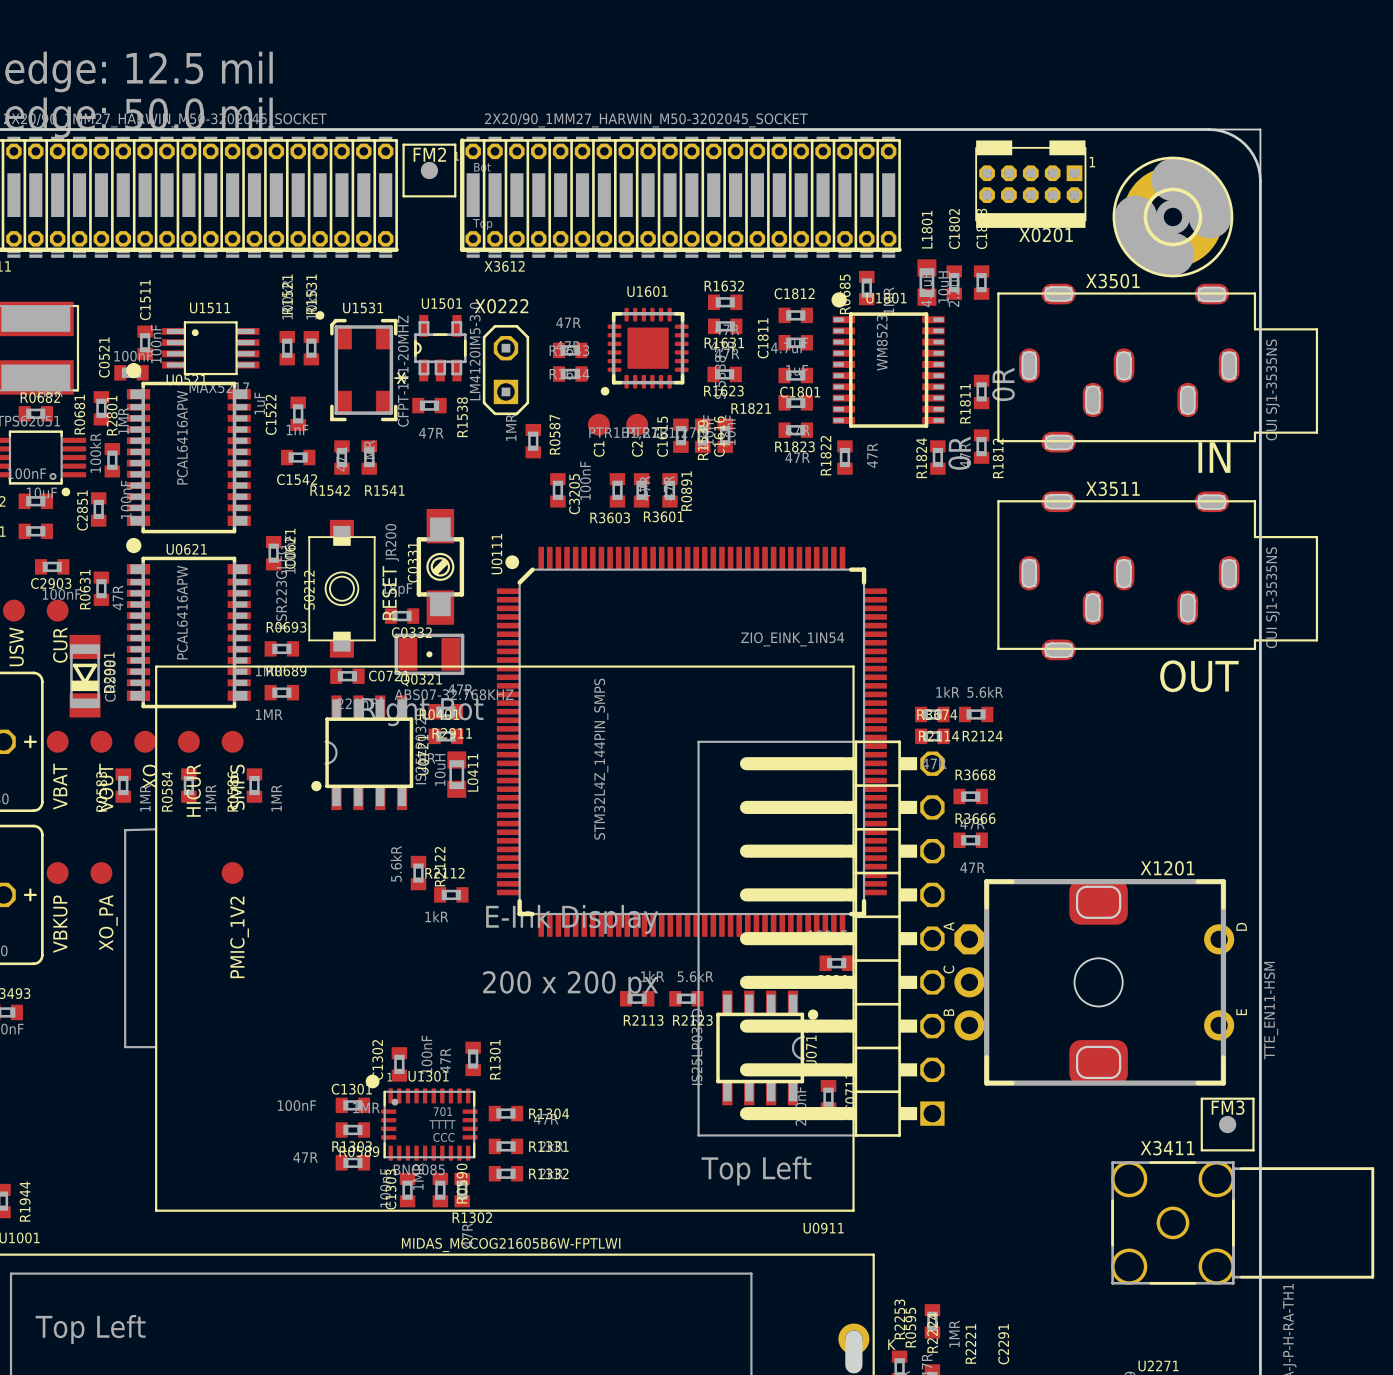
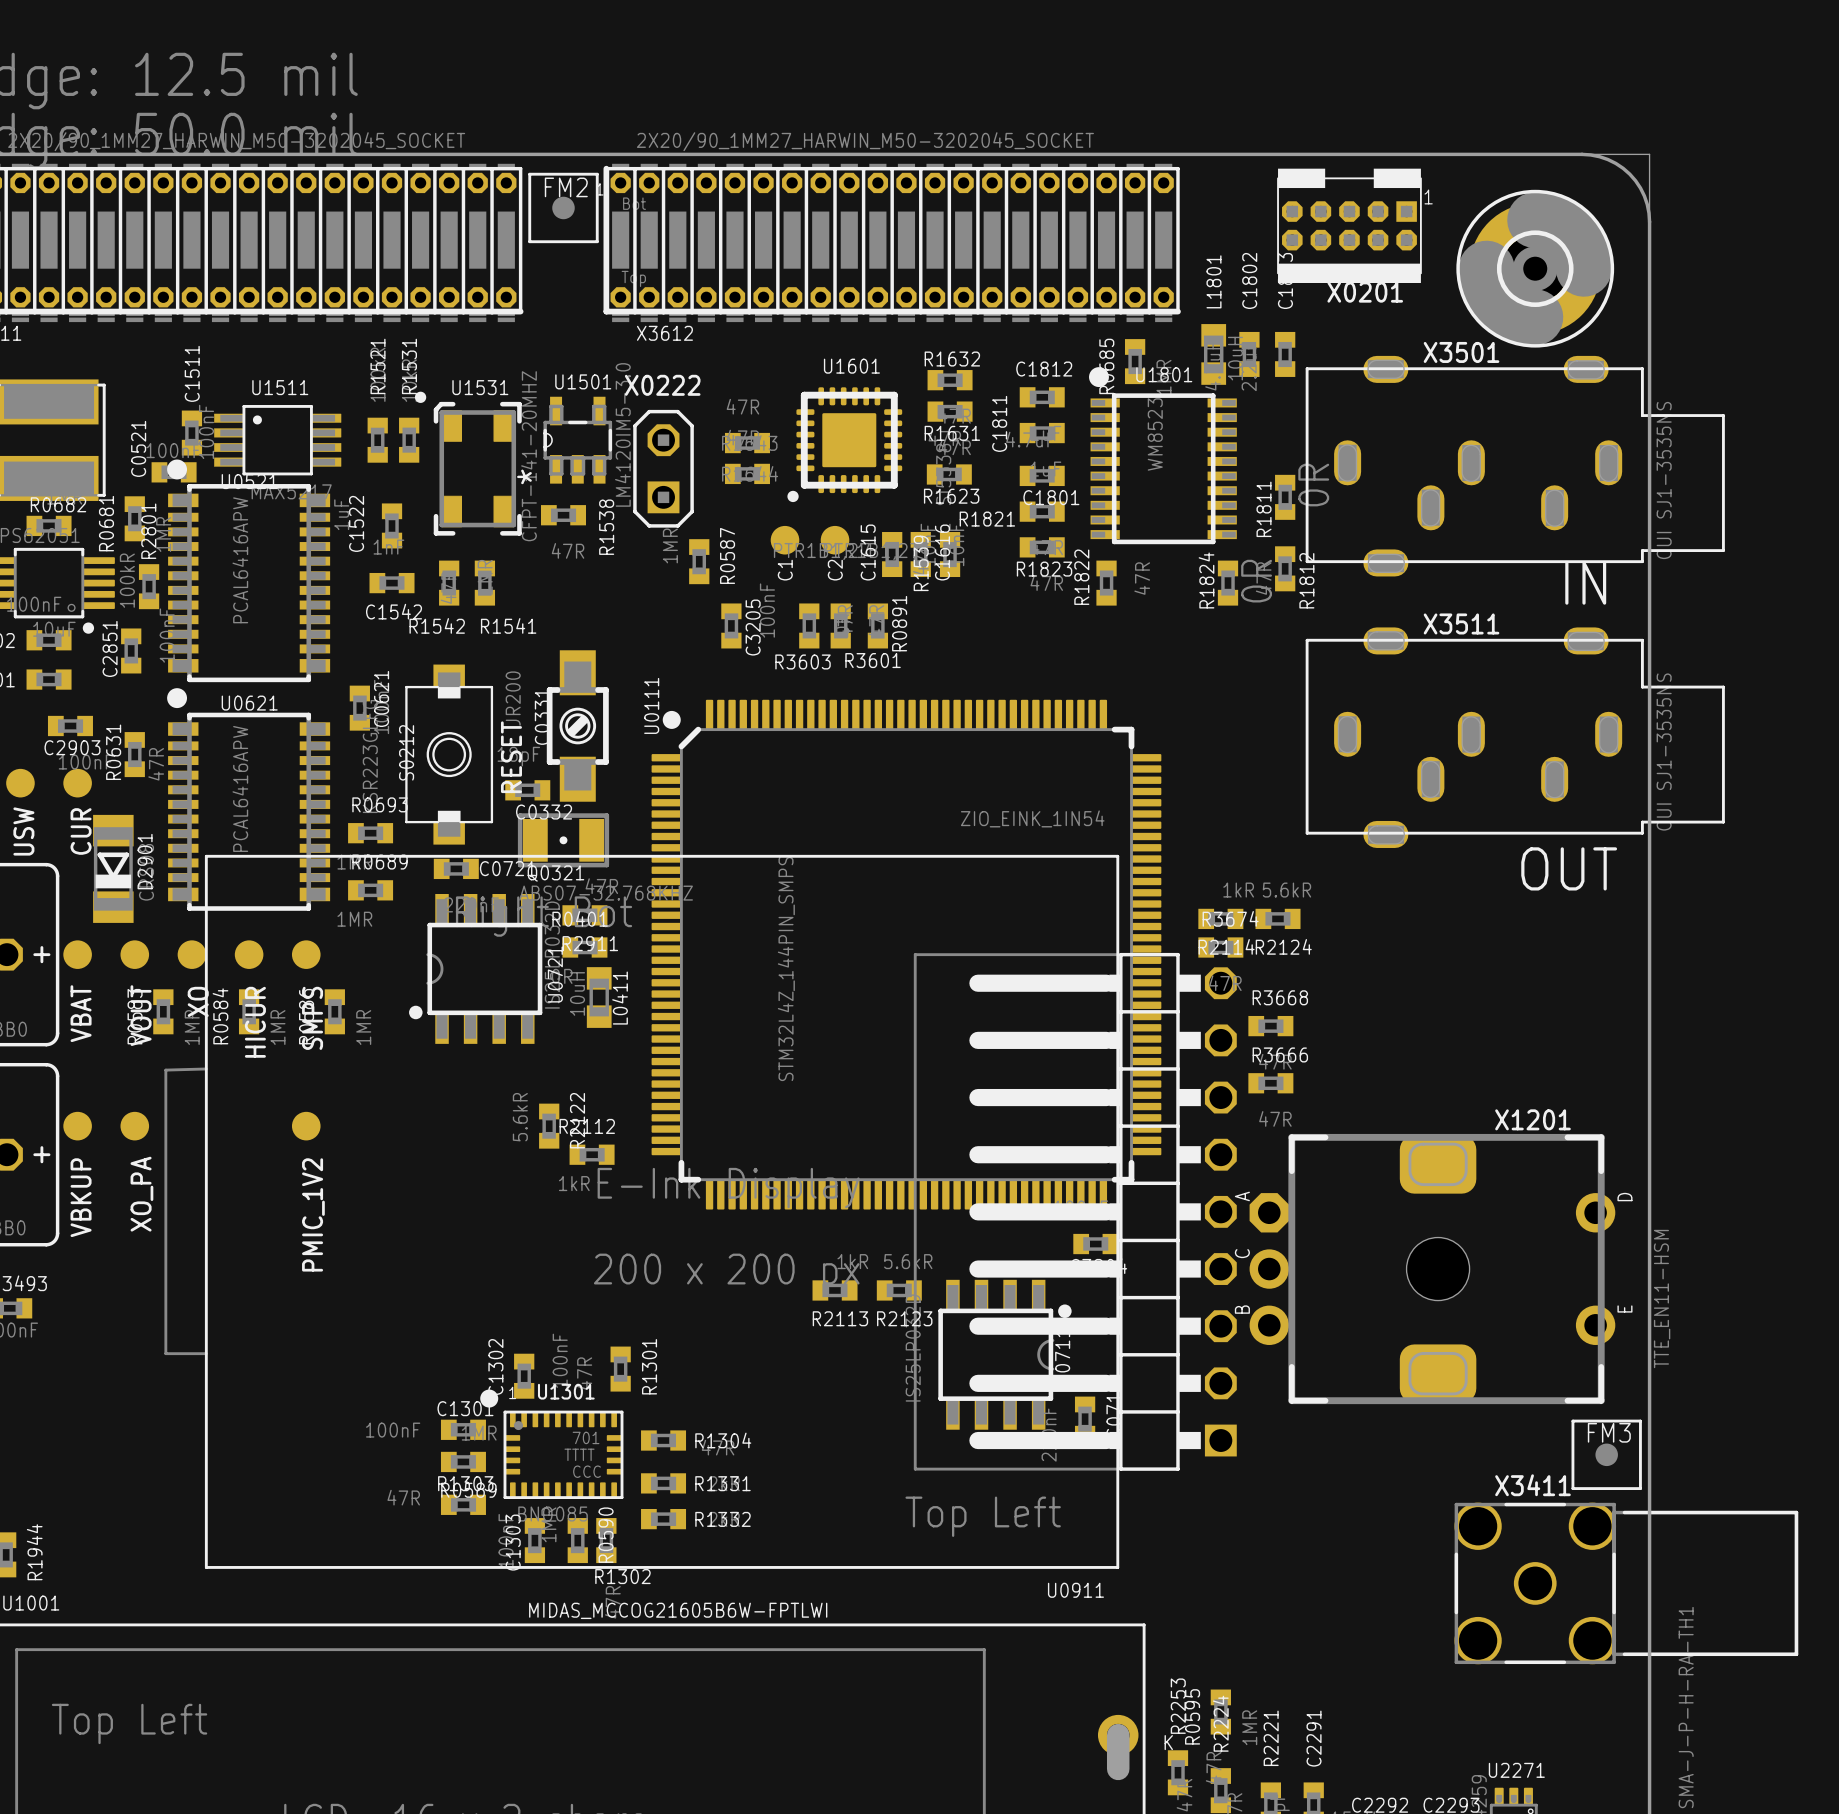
U1601 footprint: [600, 307, 689, 396] -> [787, 387, 903, 503]
U1301 footprint: [365, 1074, 478, 1161] -> [480, 1389, 624, 1500]

